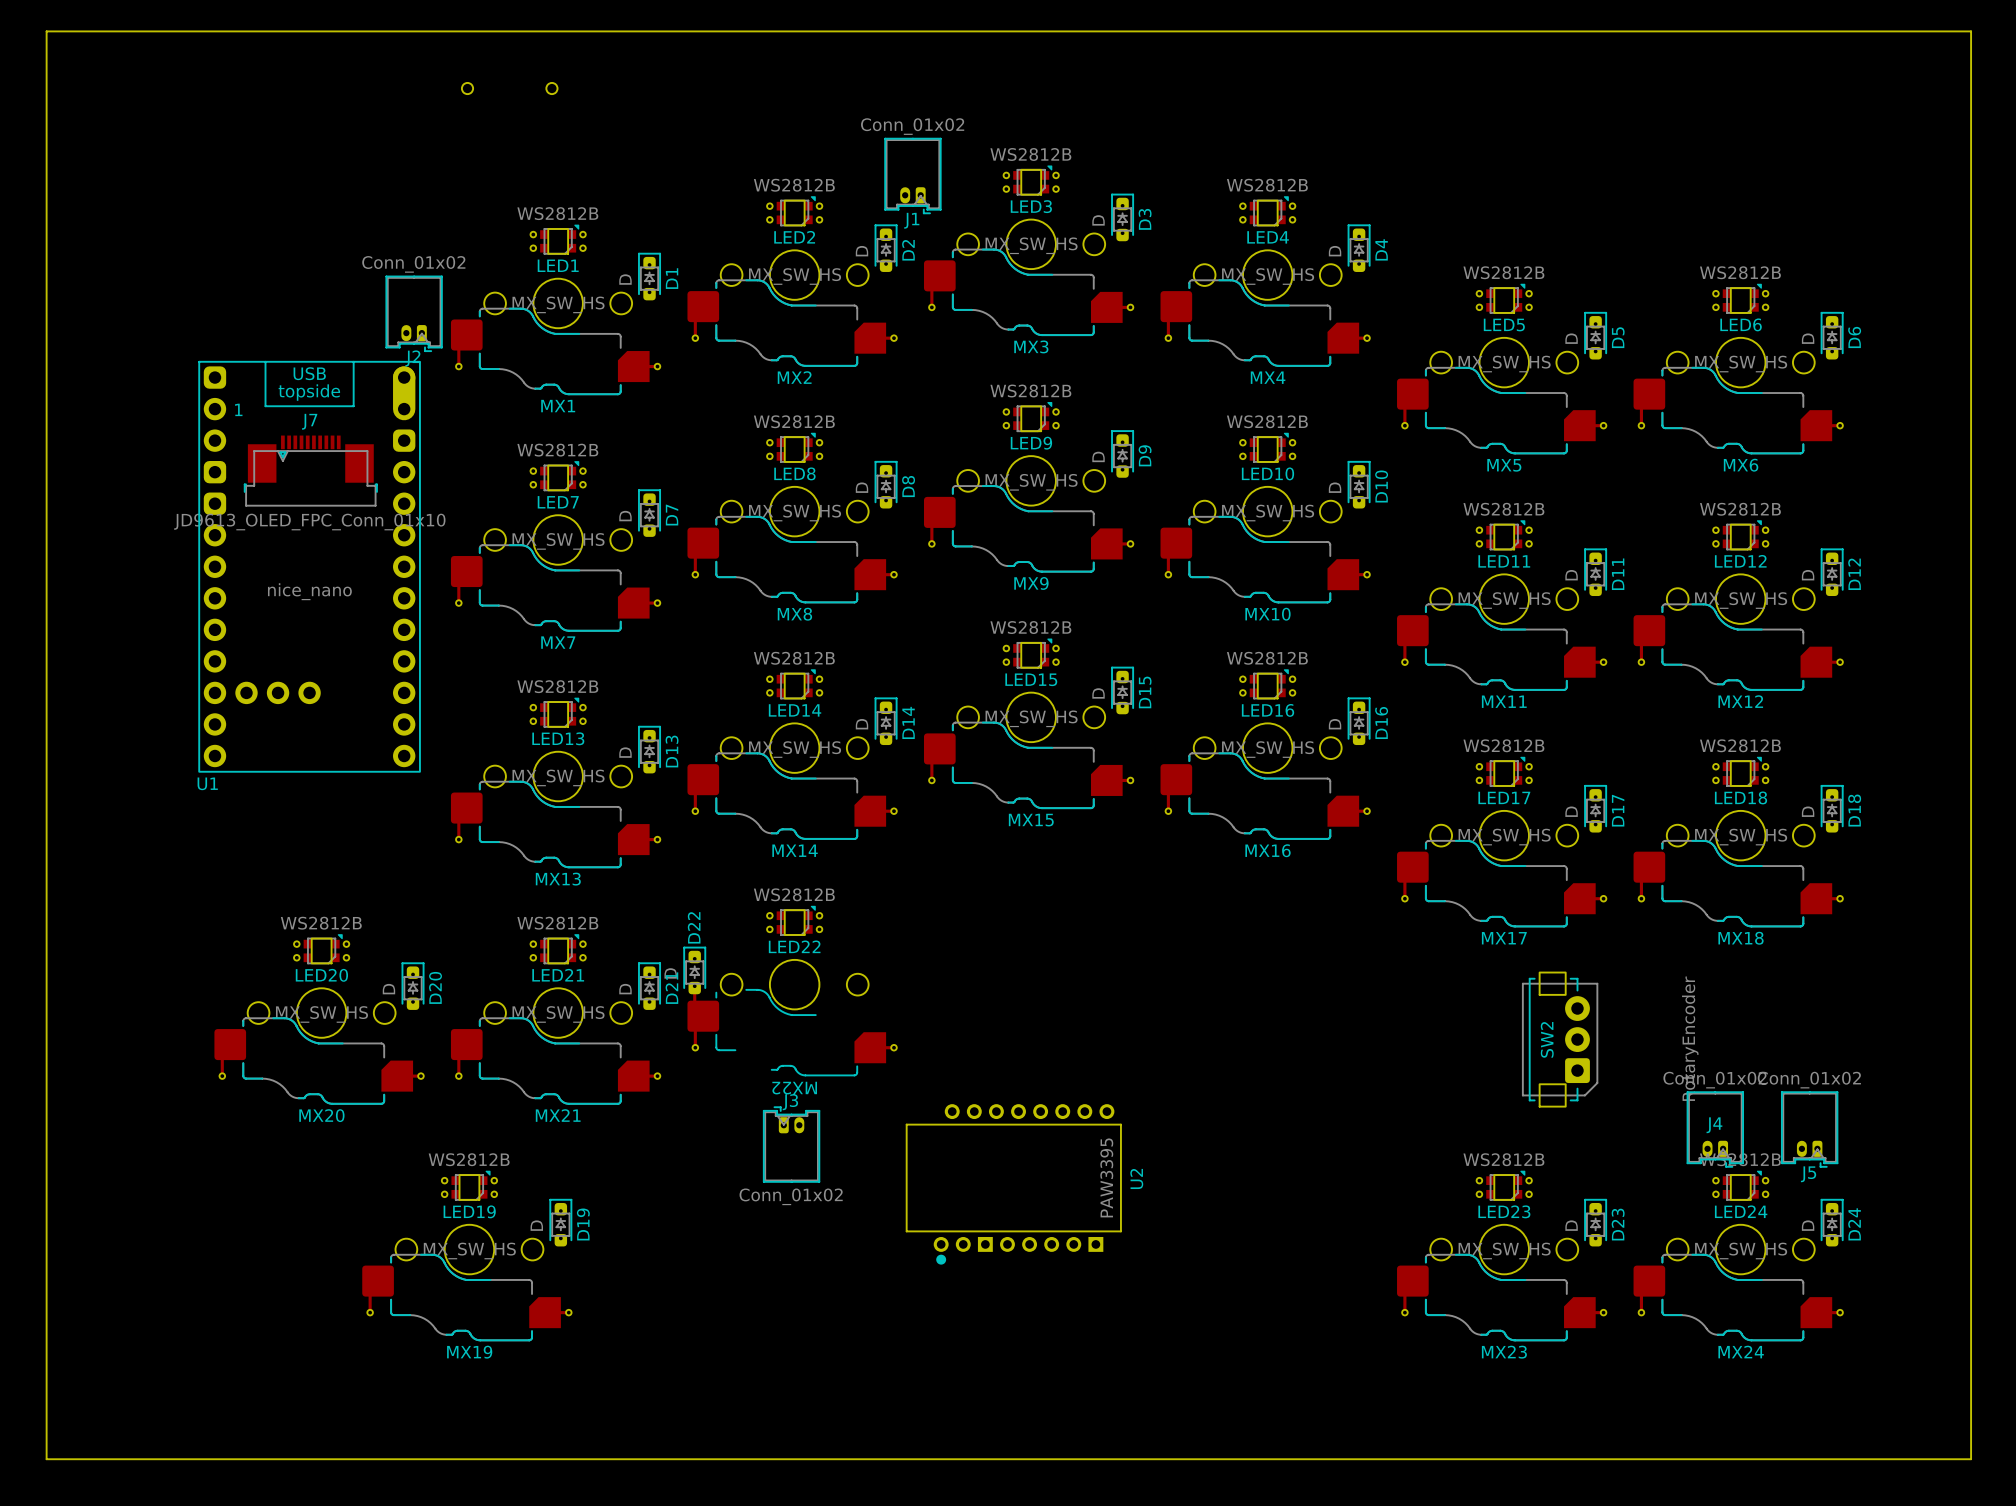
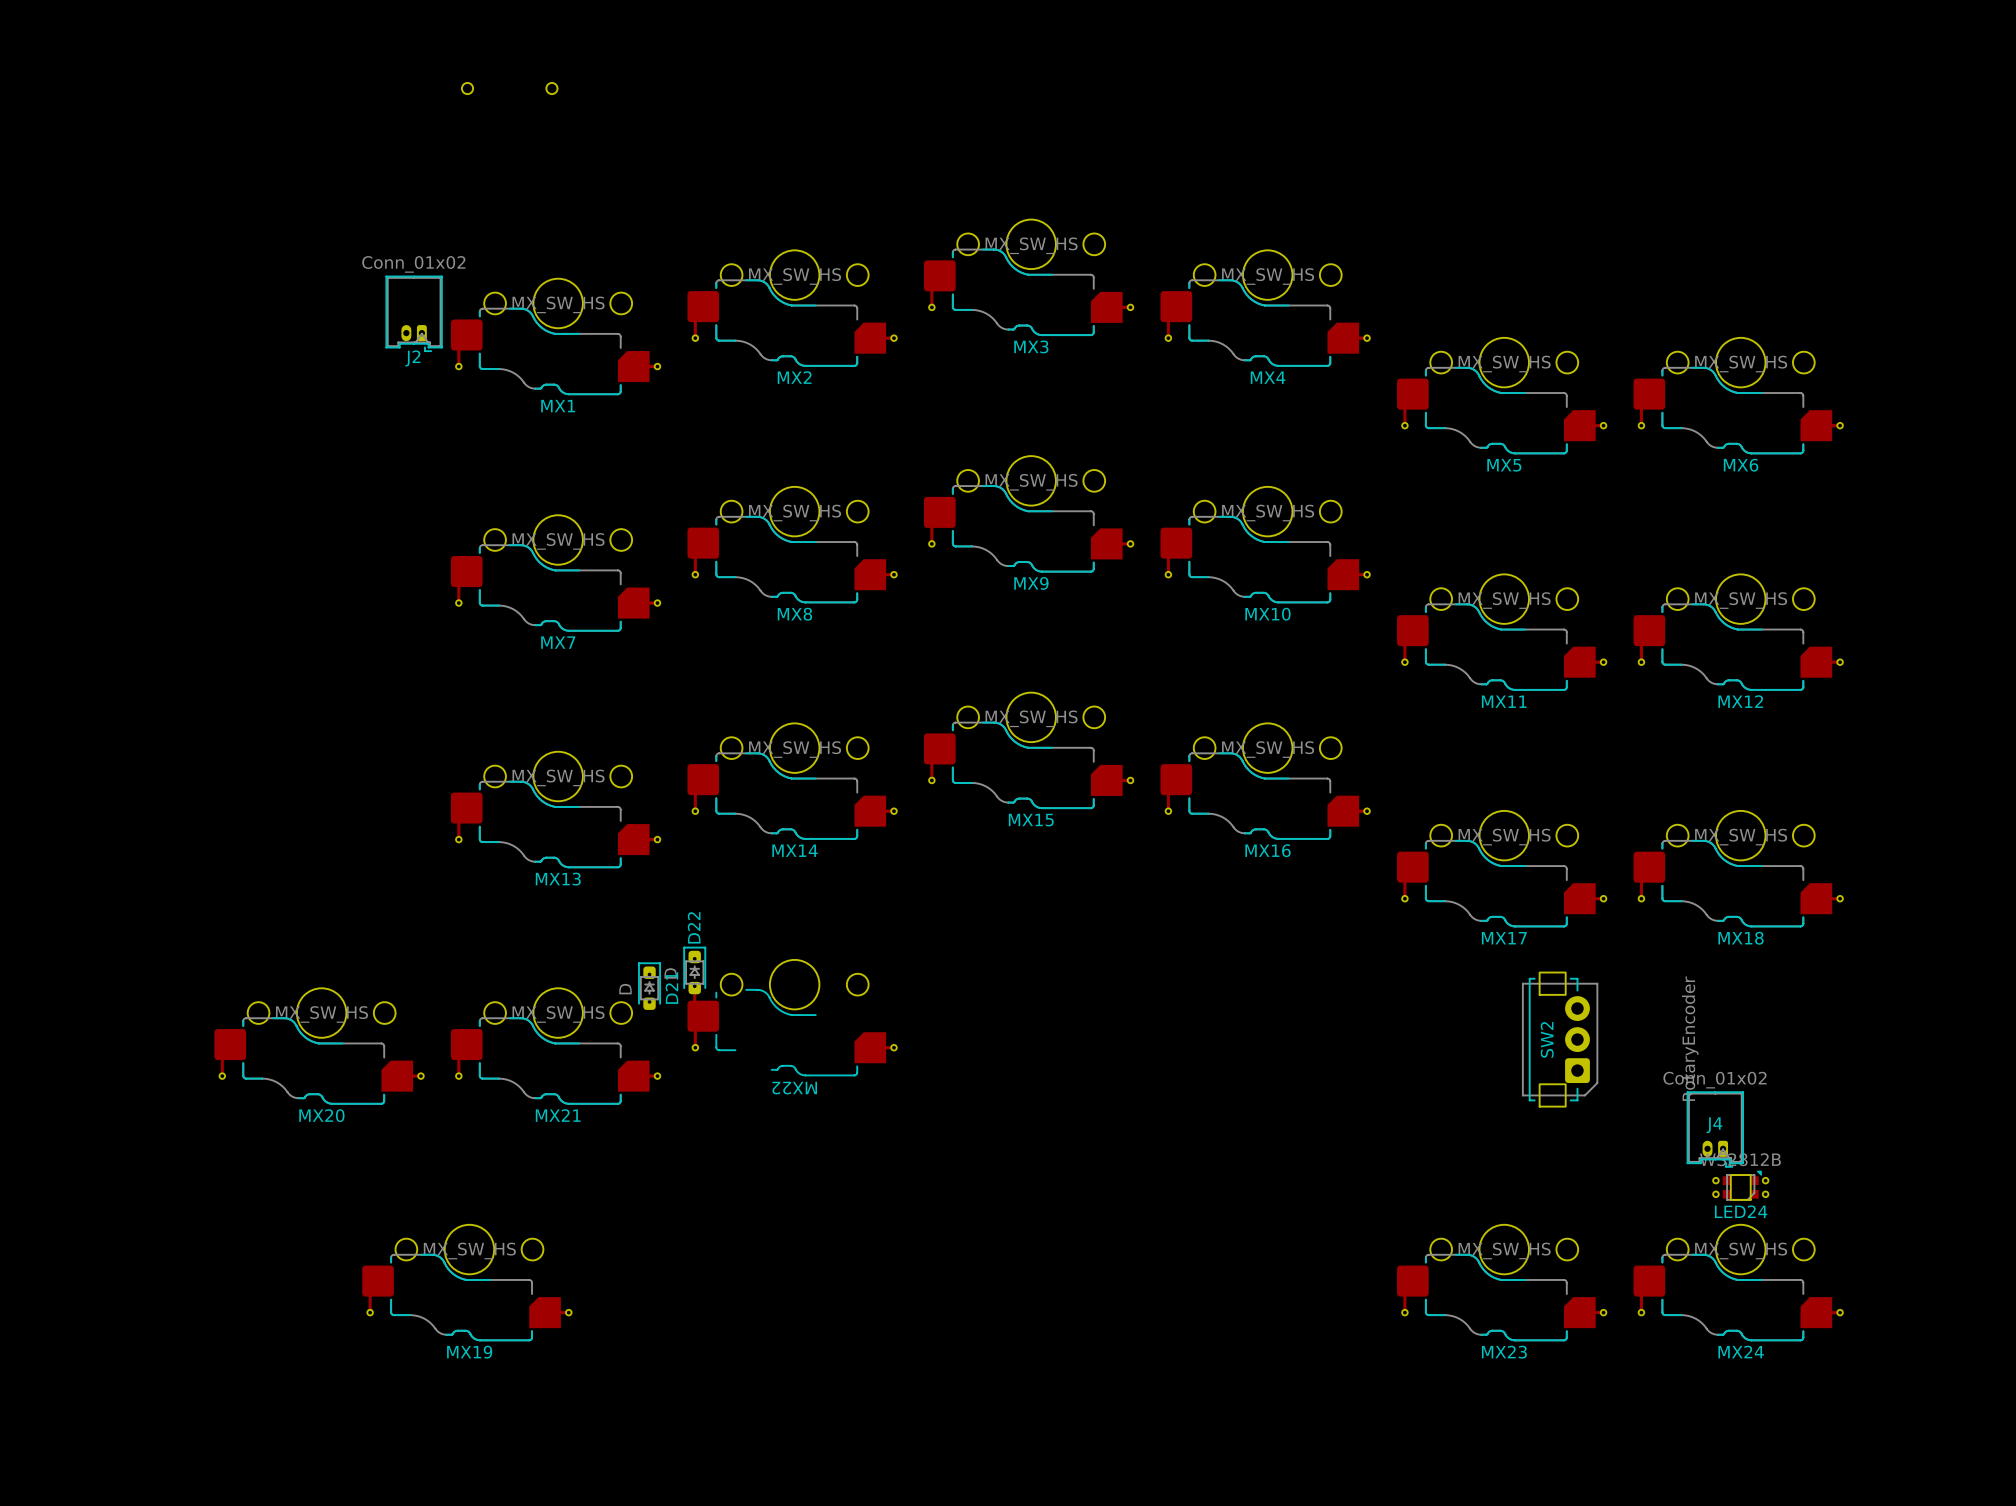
board edge: (46, 31) (46, 1459) (1971, 1459) (1971, 31) (46, 31) -> none
J1: Conn_01x02 (912, 175) -> none
LED3: WS2812B (1031, 180) -> none
LED2: WS2812B (794, 211) -> none
LED4: WS2812B (1267, 211) -> none
D3: D (1122, 217) -> none
LED1: WS2812B (558, 239) -> none
D2: D (886, 248) -> none
D4: D (1359, 248) -> none
D1: D (649, 276) -> none
LED5: WS2812B (1504, 298) -> none
LED6: WS2812B (1740, 298) -> none
D5: D (1595, 335) -> none
D6: D (1832, 335) -> none
LED9: WS2812B (1031, 416) -> none
LED8: WS2812B (794, 447) -> none
LED10: WS2812B (1267, 447) -> none
D9: D (1122, 454) -> none
J7: JD9613_OLED_FPC_Conn_01x10 (310, 470) -> none
LED7: WS2812B (558, 476) -> none
D8: D (886, 484) -> none
D10: D (1359, 484) -> none
D7: D (649, 513) -> none
LED11: WS2812B (1504, 535) -> none
LED12: WS2812B (1740, 535) -> none
U1: nice_nano (309, 566) -> none
D11: D (1595, 572) -> none
D12: D (1832, 572) -> none
LED15: WS2812B (1031, 653) -> none
LED14: WS2812B (794, 684) -> none
LED16: WS2812B (1267, 684) -> none
D15: D (1122, 690) -> none
LED13: WS2812B (558, 712) -> none
D14: D (886, 721) -> none
D16: D (1359, 721) -> none
D13: D (649, 749) -> none
LED17: WS2812B (1504, 771) -> none
LED18: WS2812B (1740, 771) -> none
D17: D (1595, 808) -> none
D18: D (1832, 808) -> none
LED22: WS2812B (794, 920) -> none
LED20: WS2812B (321, 949) -> none
LED21: WS2812B (558, 949) -> none
D20: D (413, 986) -> none
J5: Conn_01x02 (1809, 1129) -> none
J3: Conn_01x02 (791, 1144) -> none
U2: PAW3395 (1013, 1184) -> none
LED19: WS2812B (469, 1185) -> none
LED23: WS2812B (1504, 1185) -> none
D19: D (560, 1222) -> none
D23: D (1595, 1222) -> none
D24: D (1832, 1222) -> none

